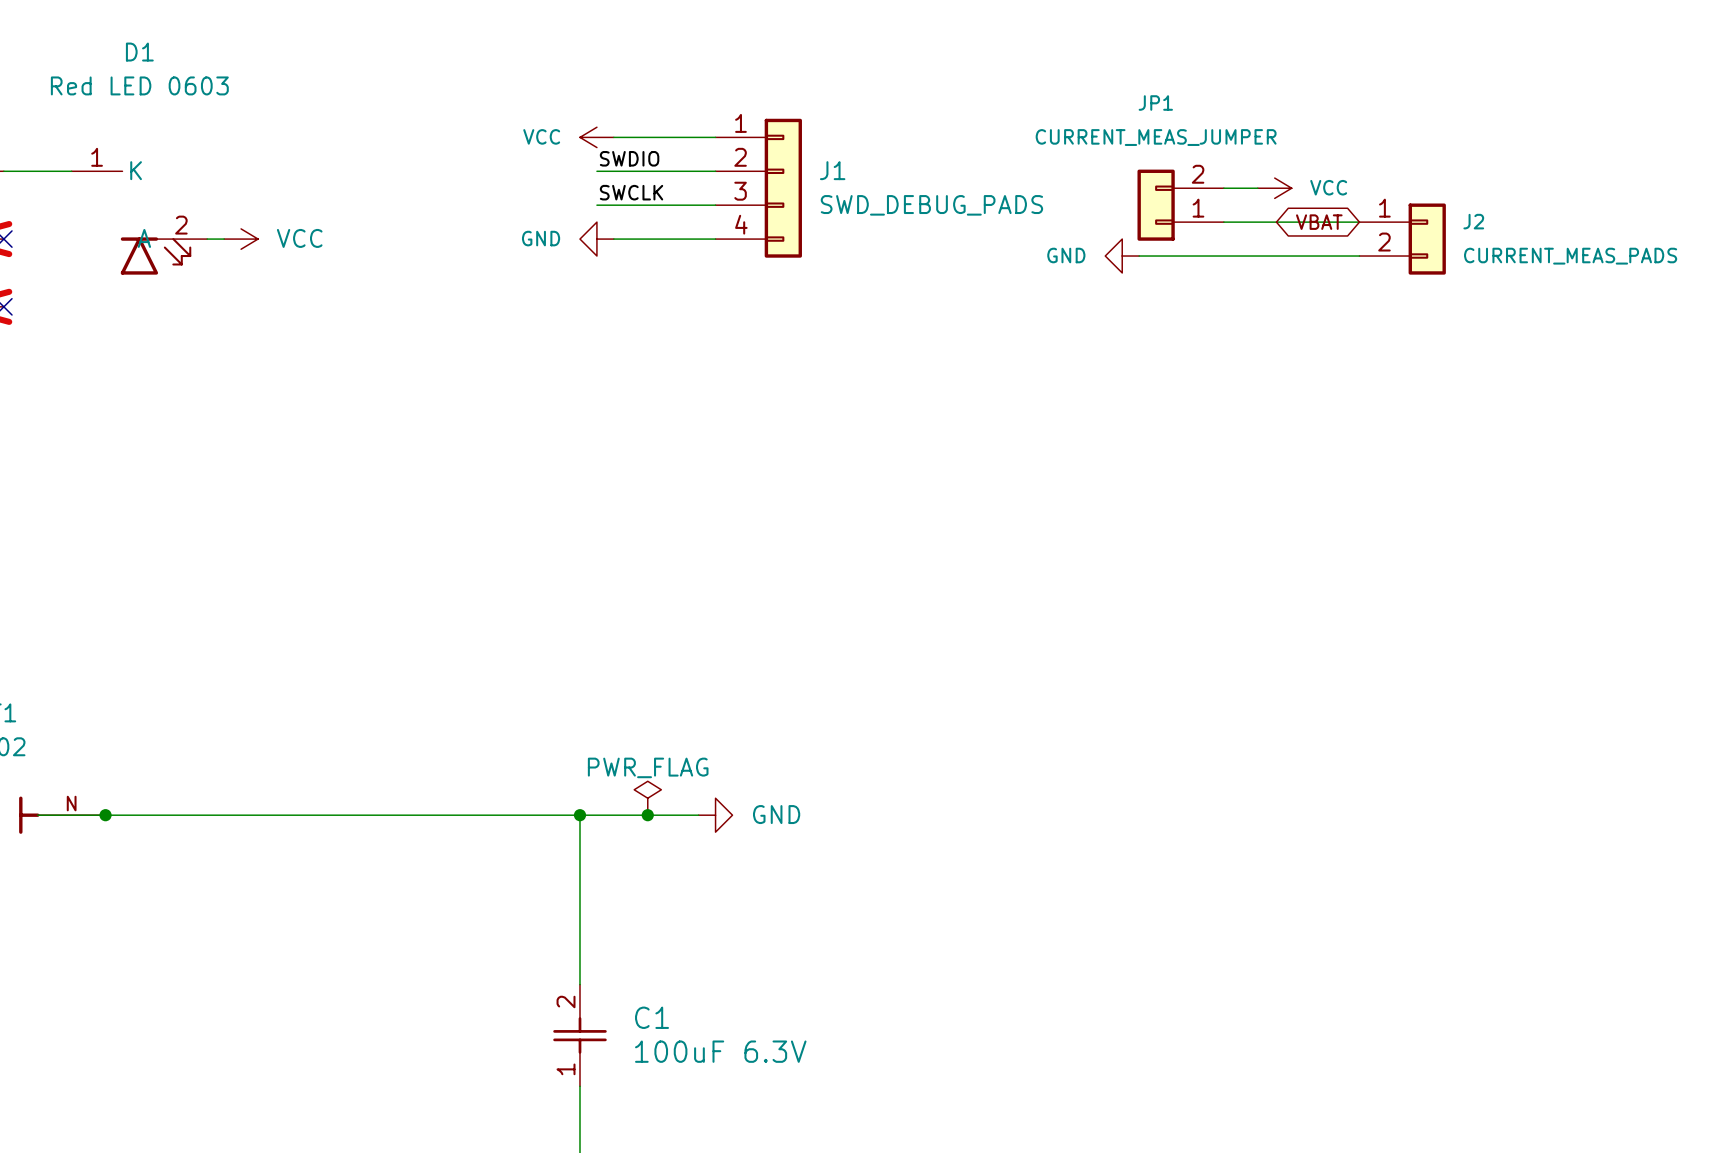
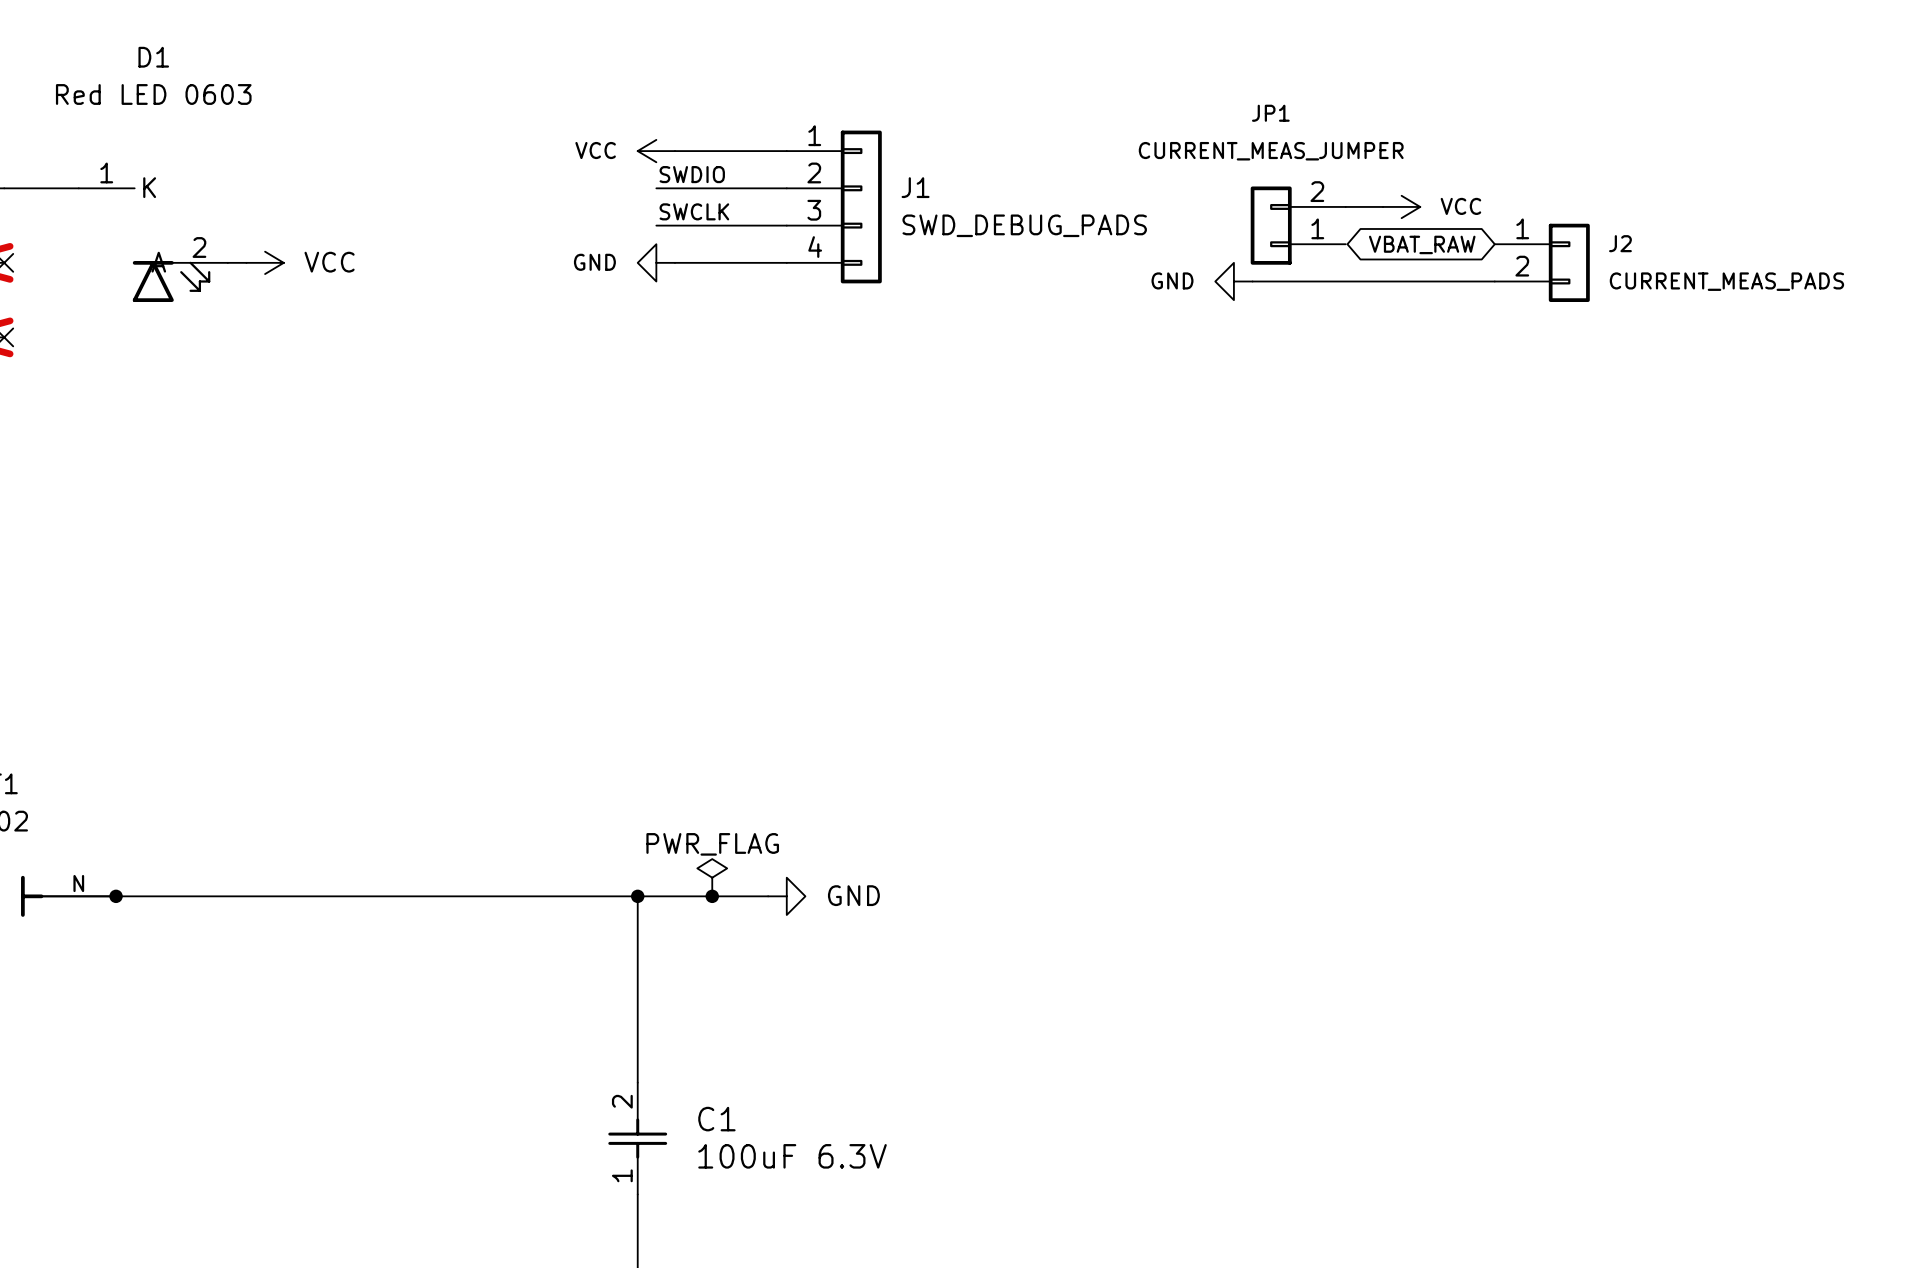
wire: (1223, 222) (1359, 222) -> none
global label: VBAT (1319, 222) -> VBAT_RAW (1422, 244)

